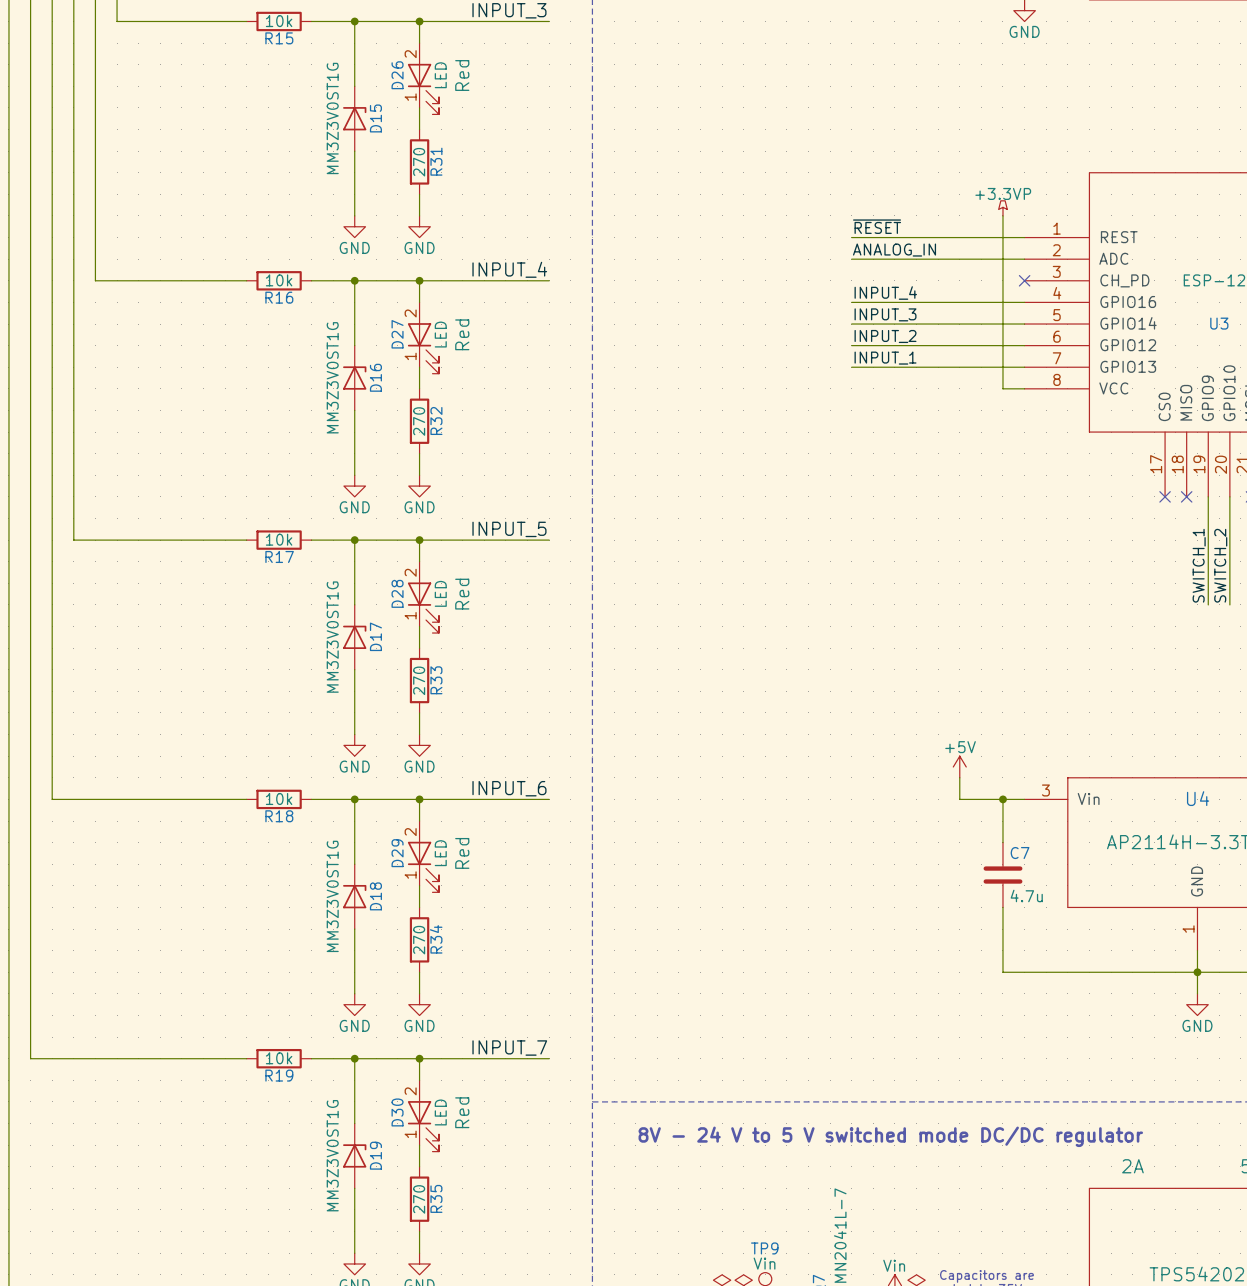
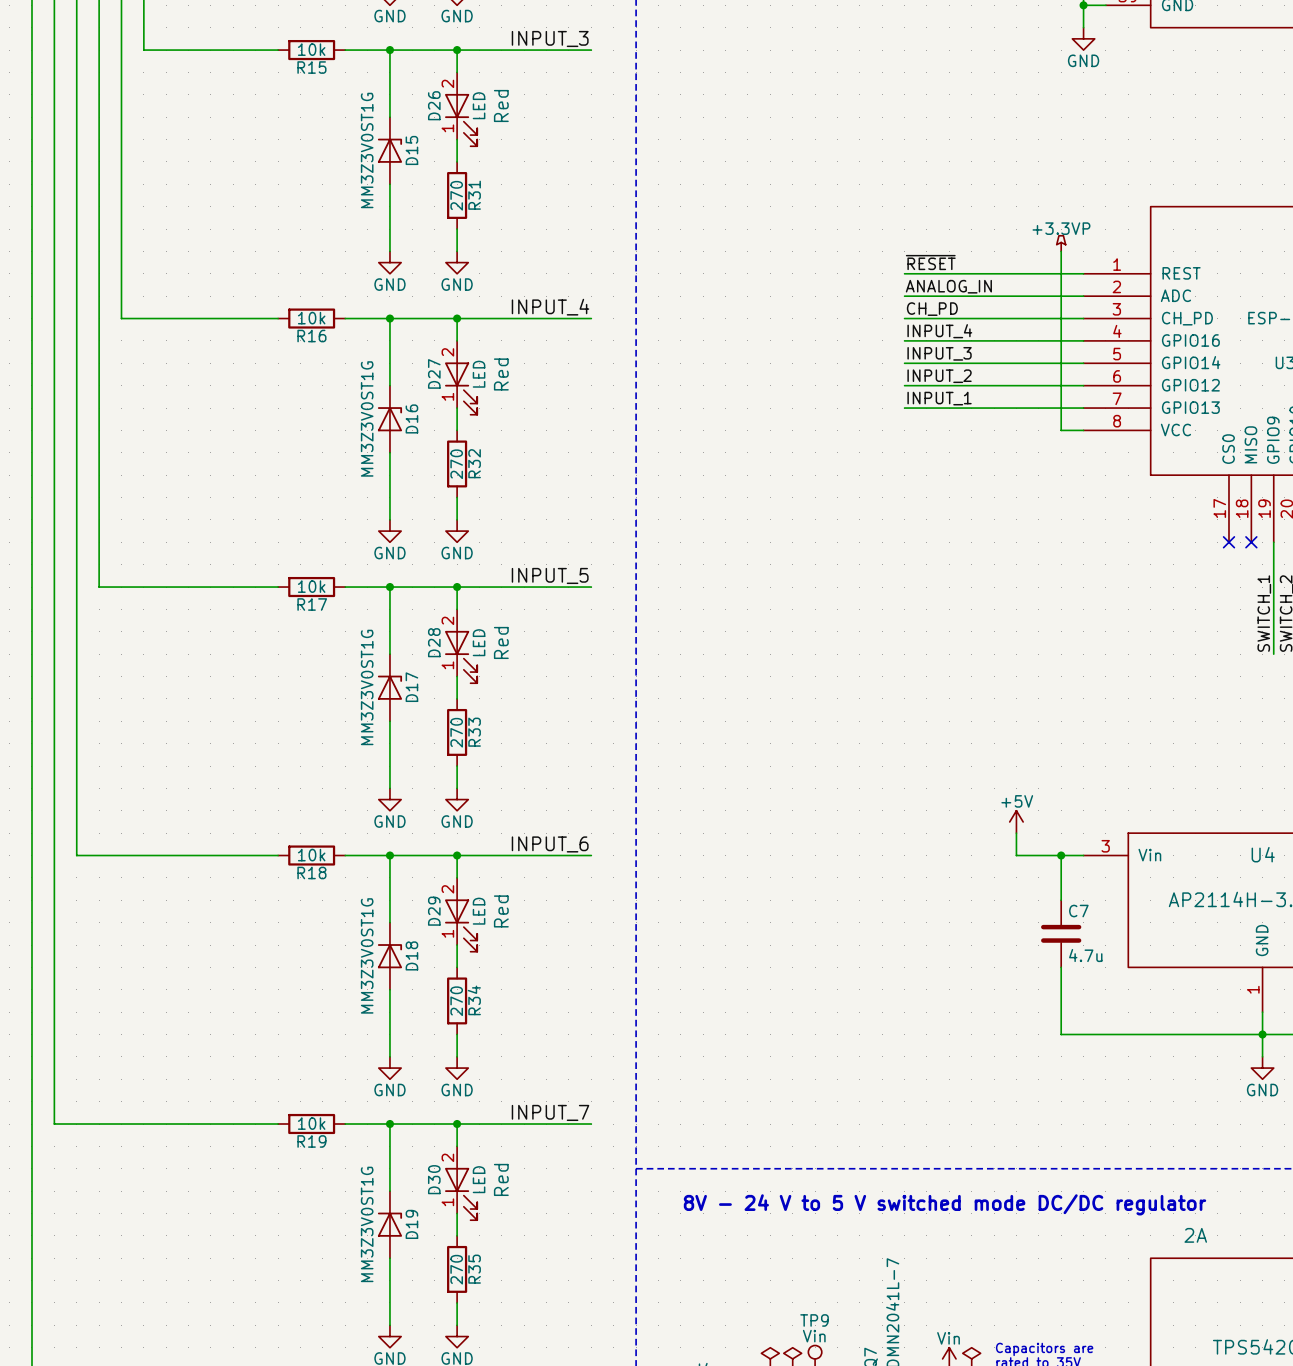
label: none -> CH_PD (932, 309)
wire: none -> (904, 318) (1083, 318)
no-connect mark: (1024, 280) -> none

